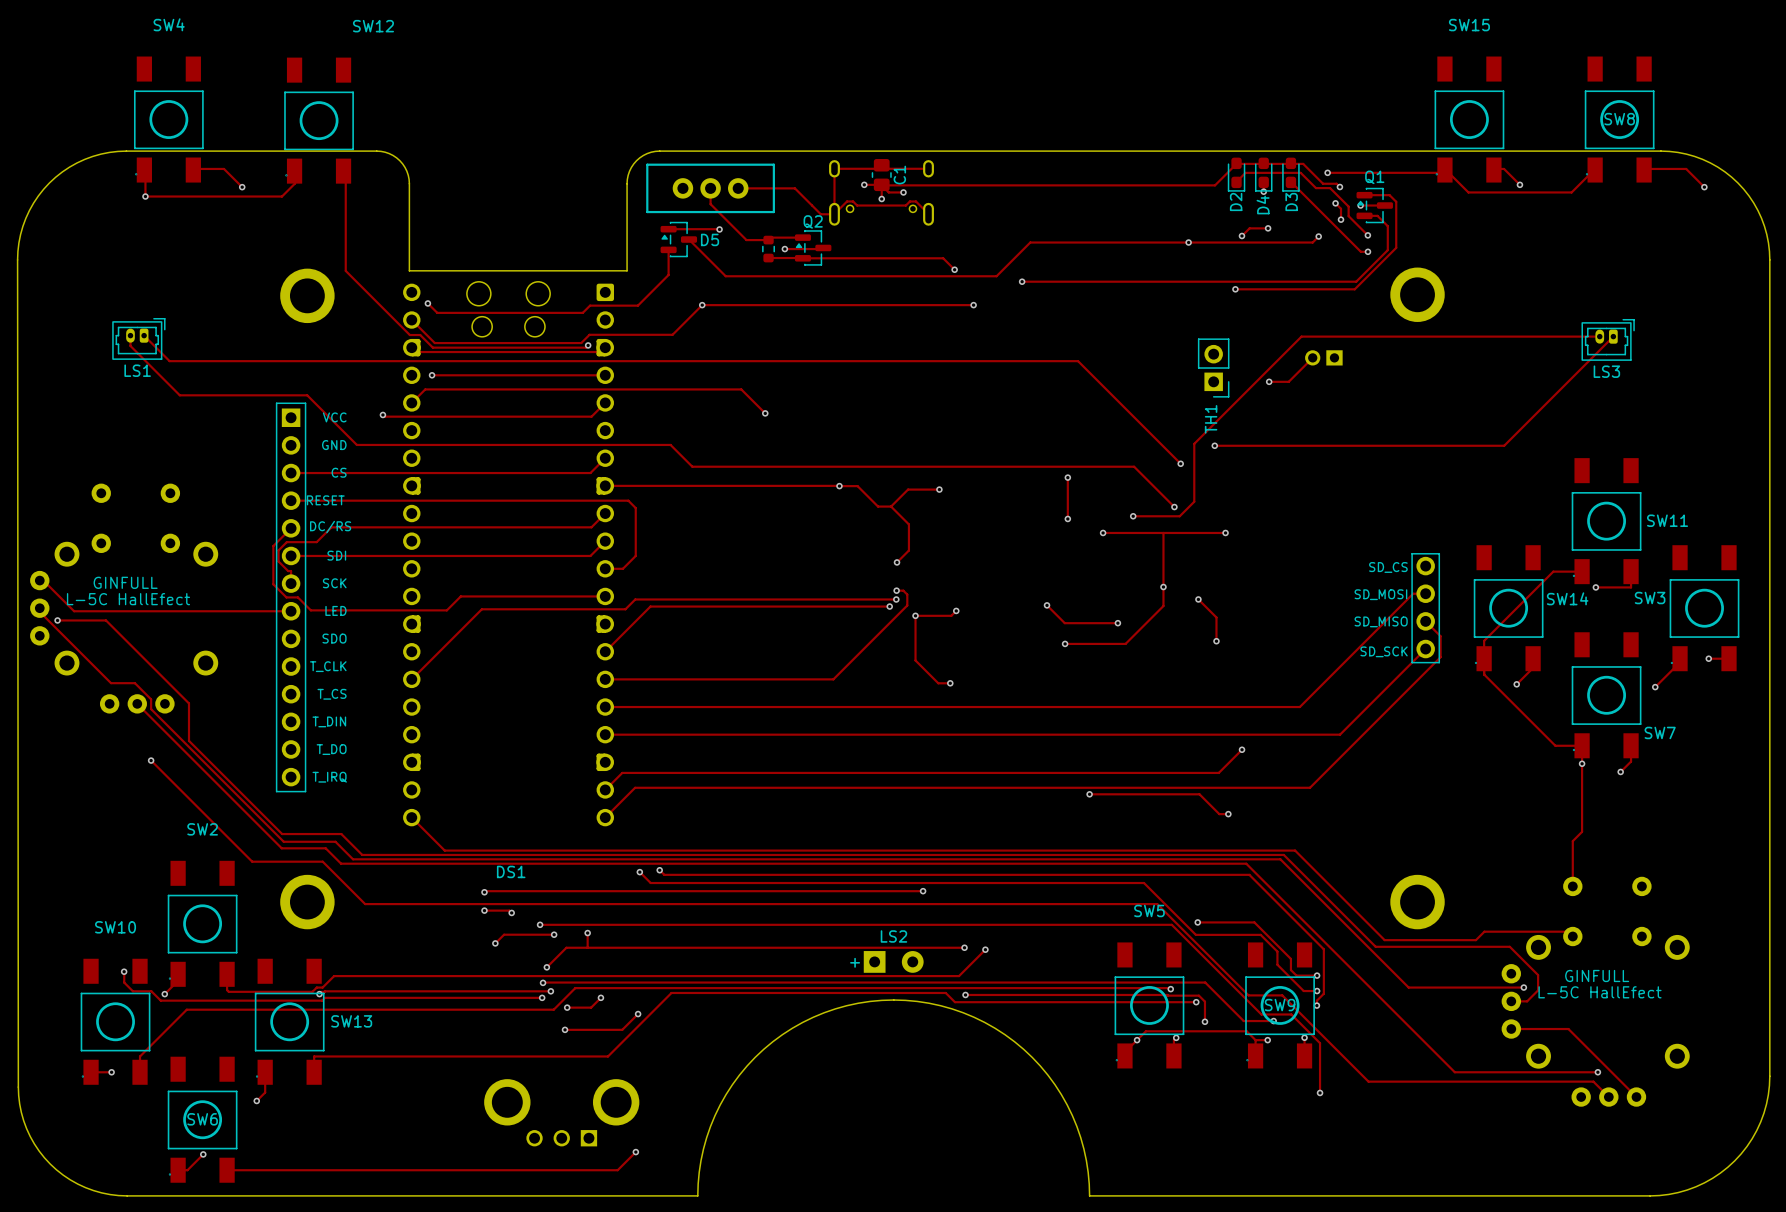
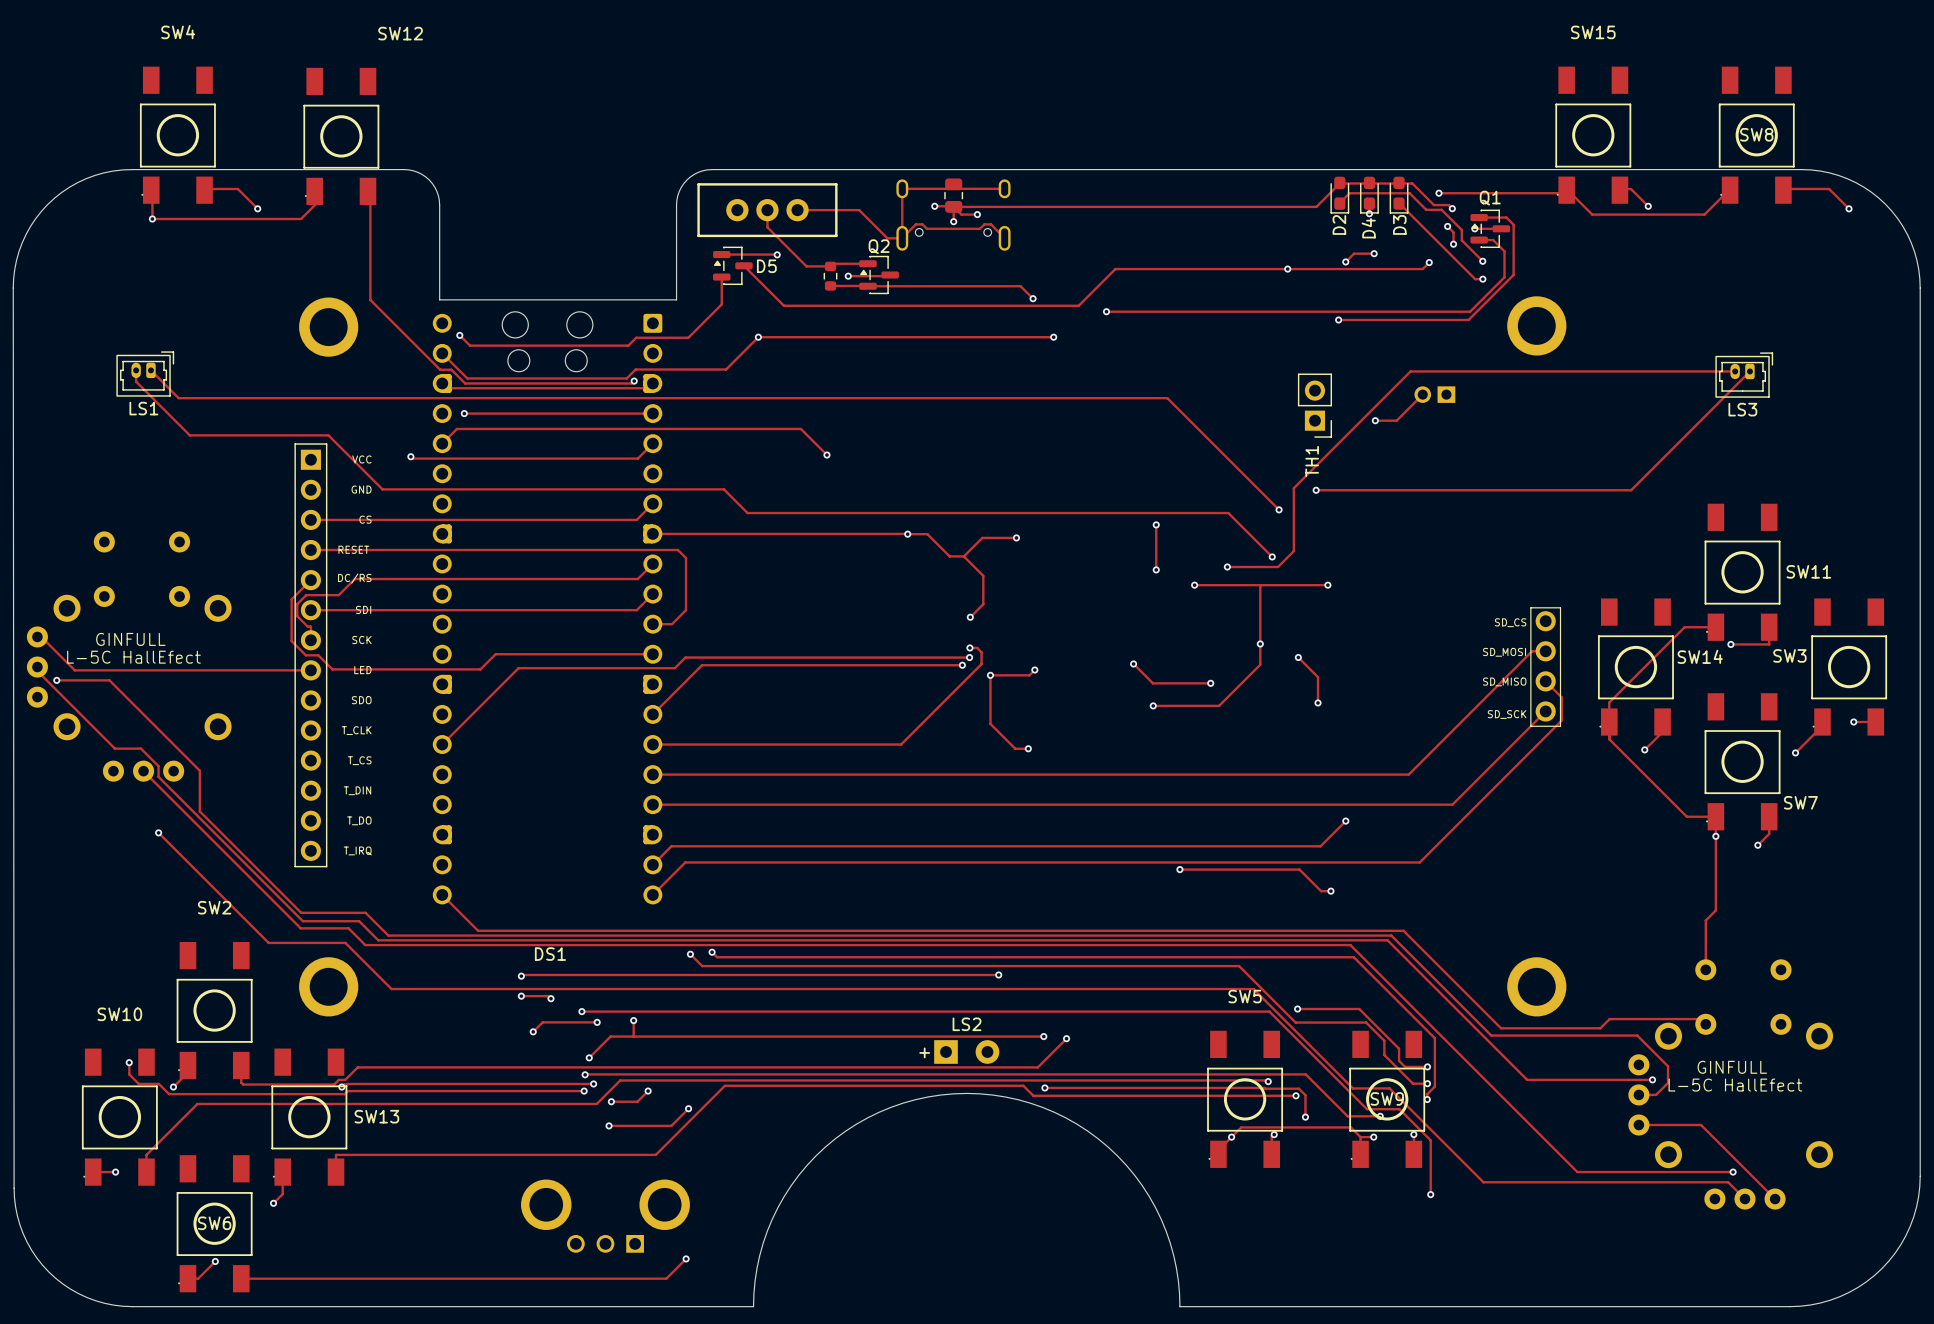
C1: (881, 175) -> none
part: none -> (953, 195)
DS1 footprint: [275, 267, 1445, 930] -> [294, 296, 1567, 1017]

